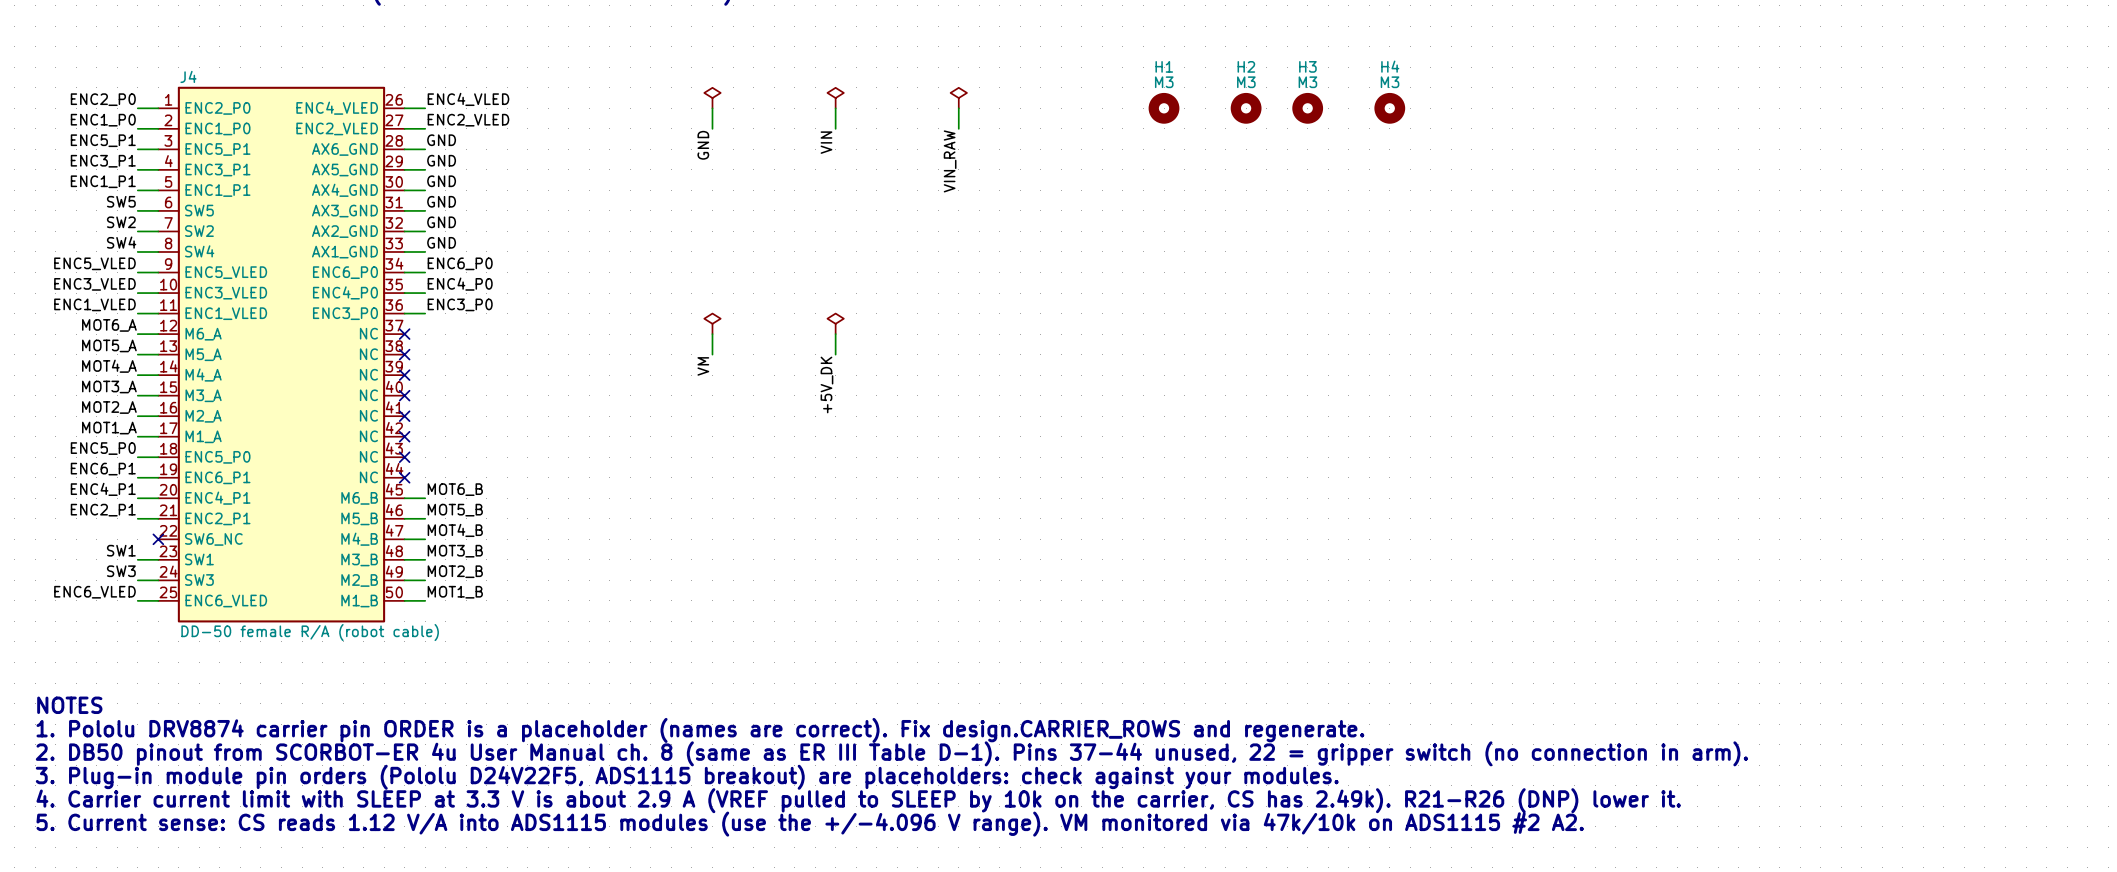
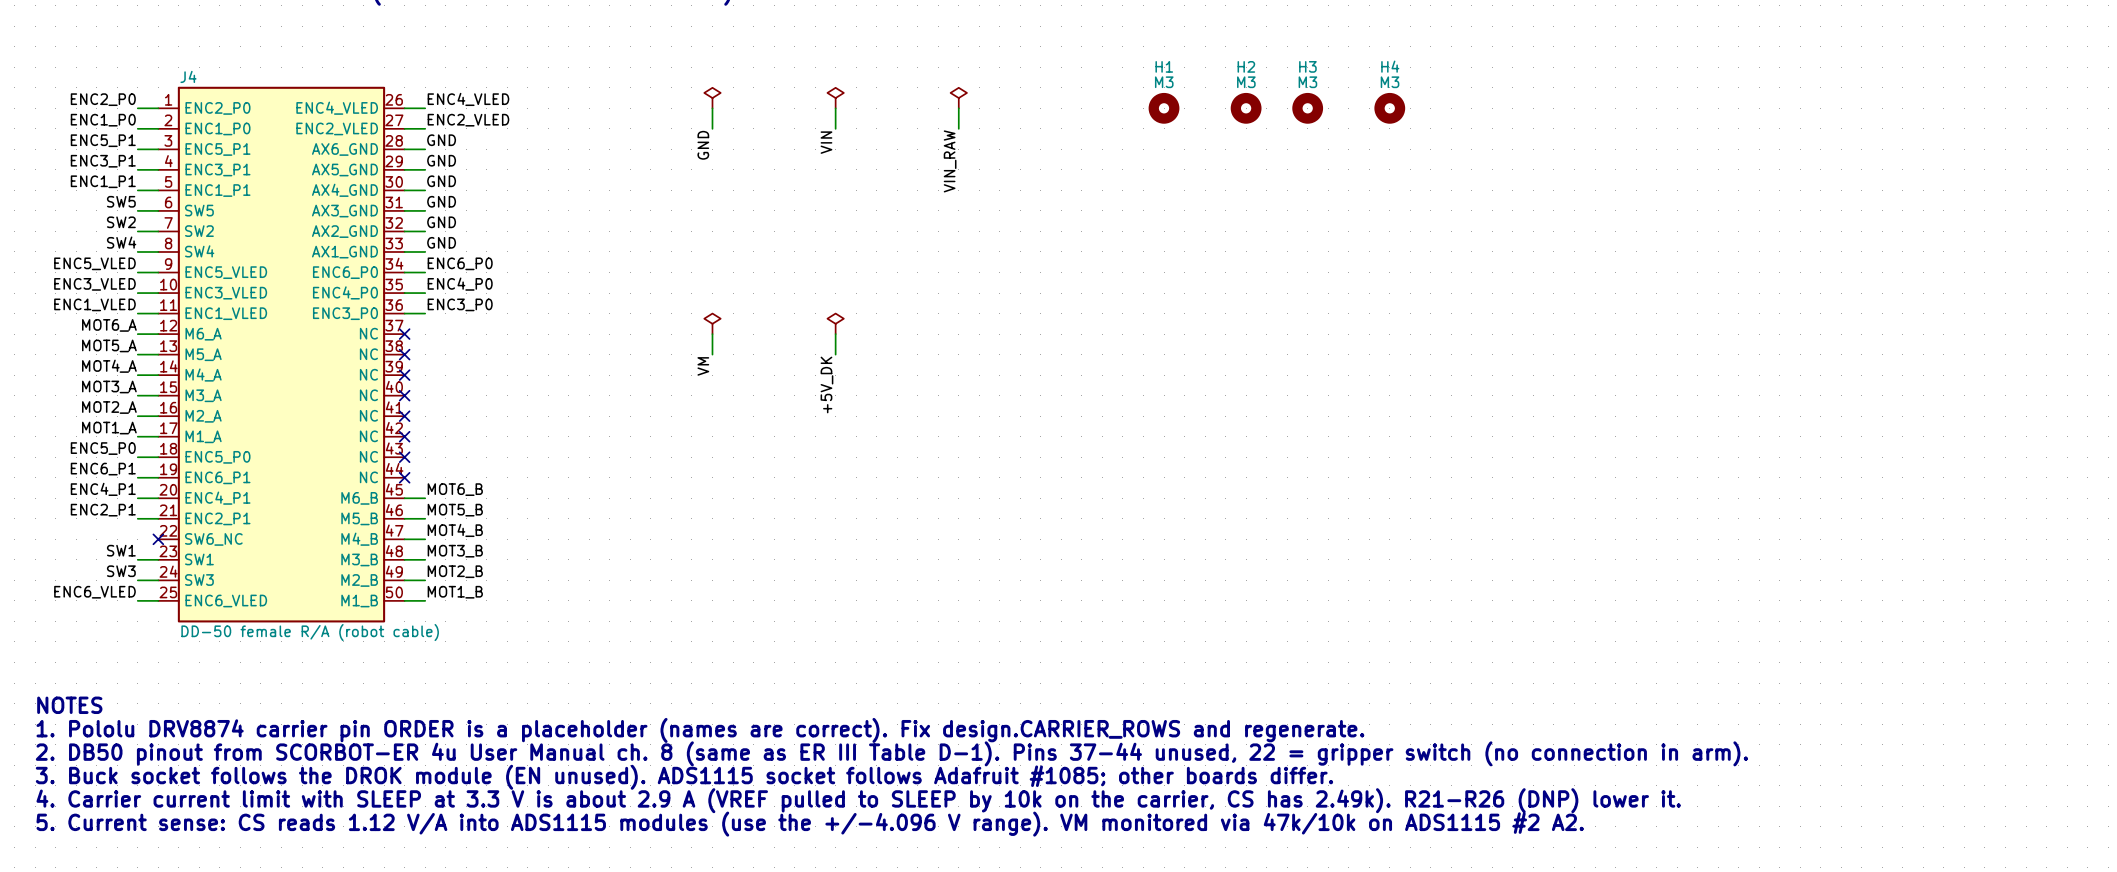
text: 3. Plug-in module pin orders (Pololu D24V22F5, ADS1115 breakout) are placeholders: check against your modules. (687, 777) -> 3. Buck socket follows the DROK module (EN unused). ADS1115 socket follows Adafruit #1085; other boards differ. (684, 777)

